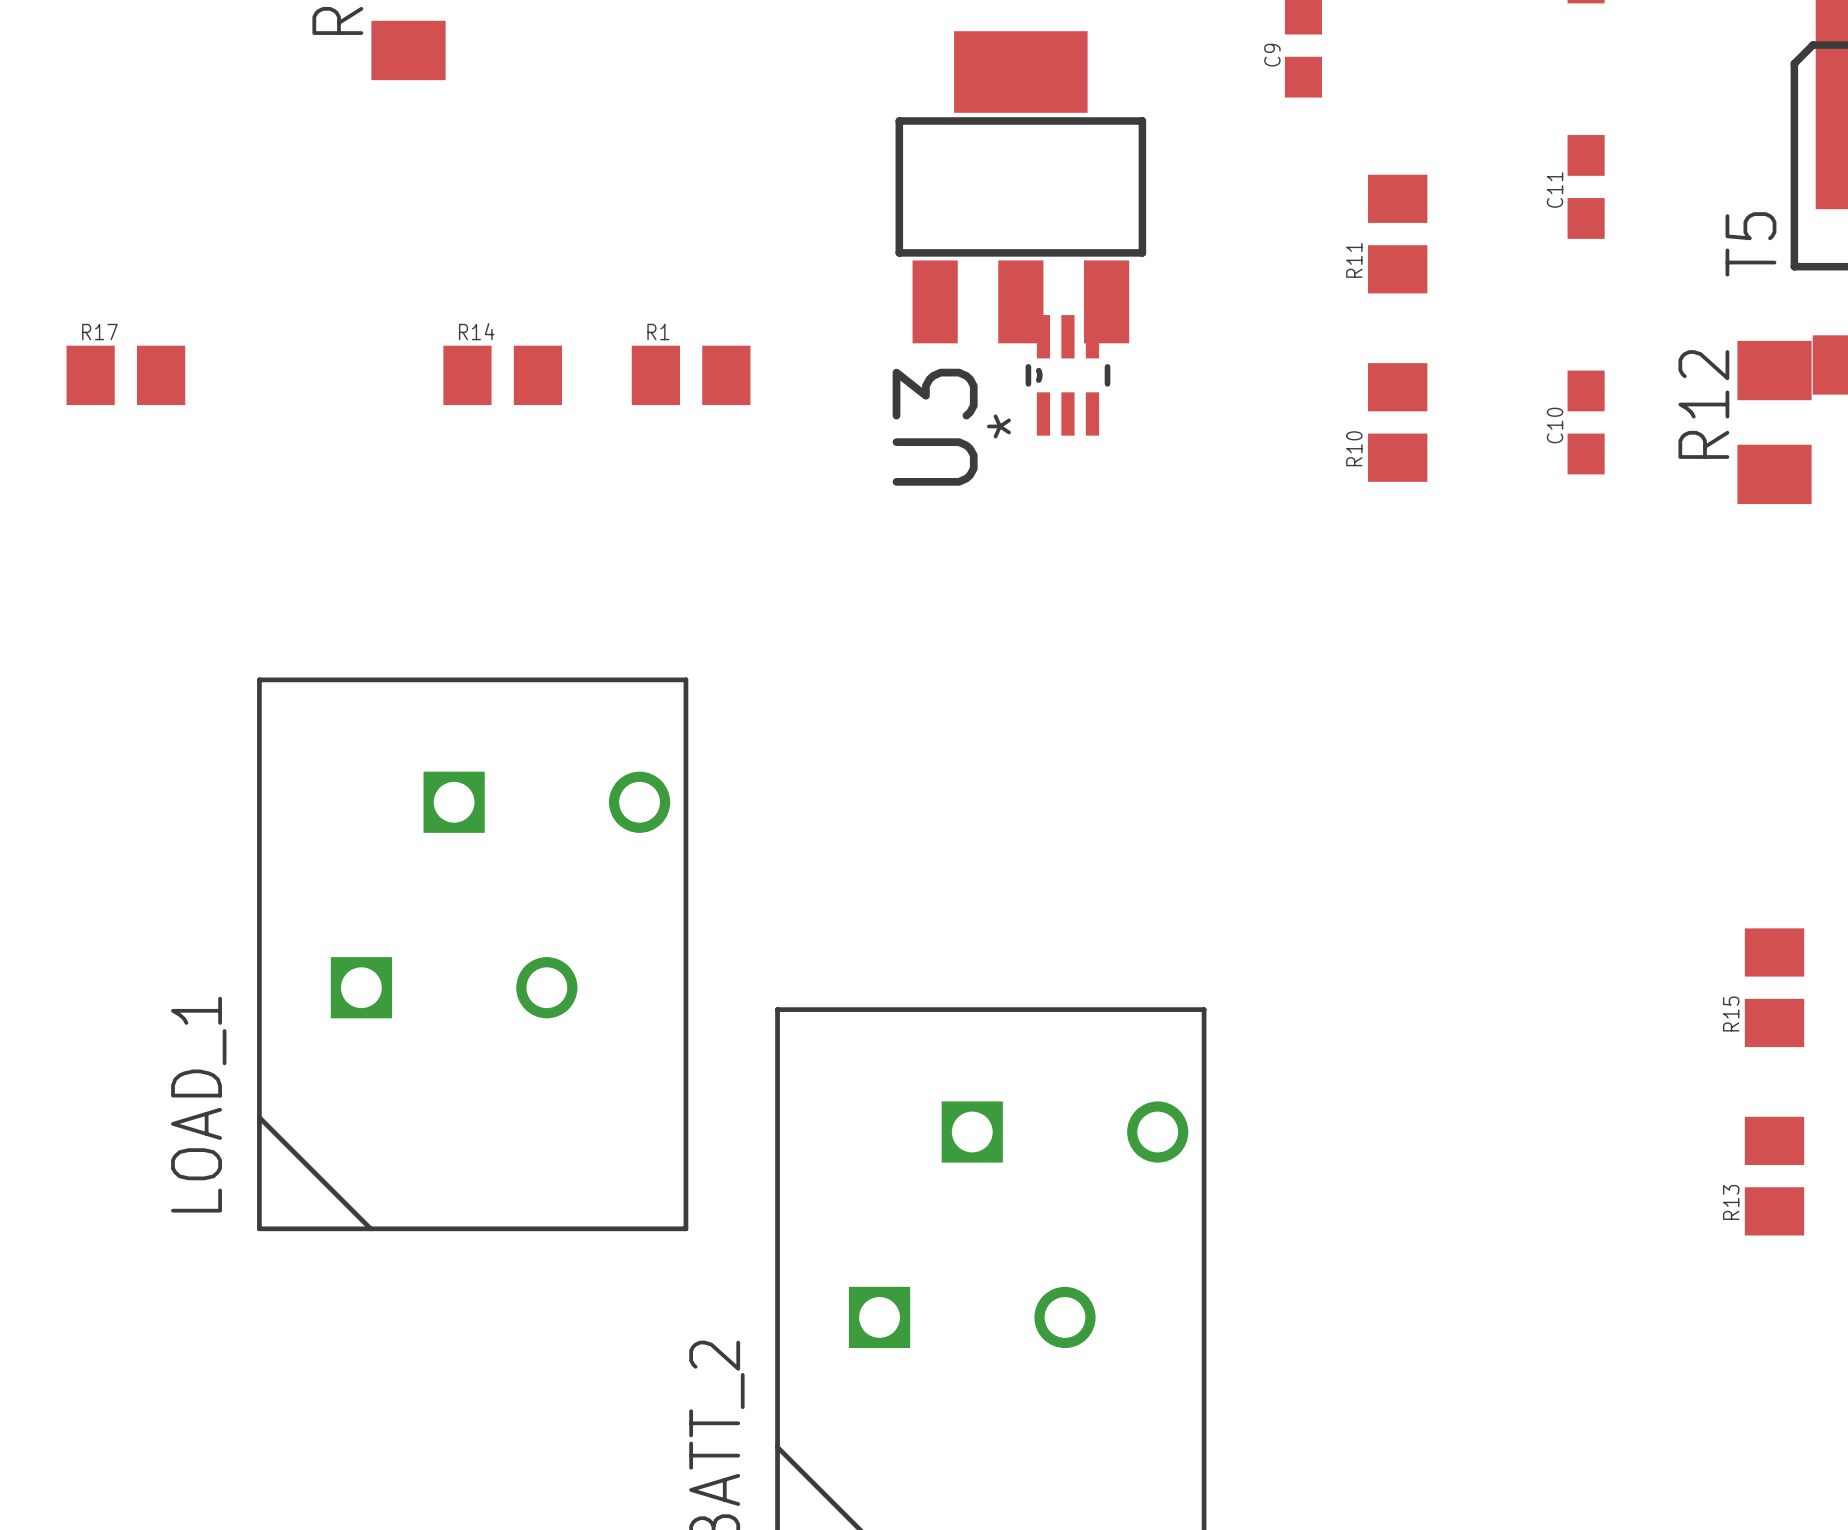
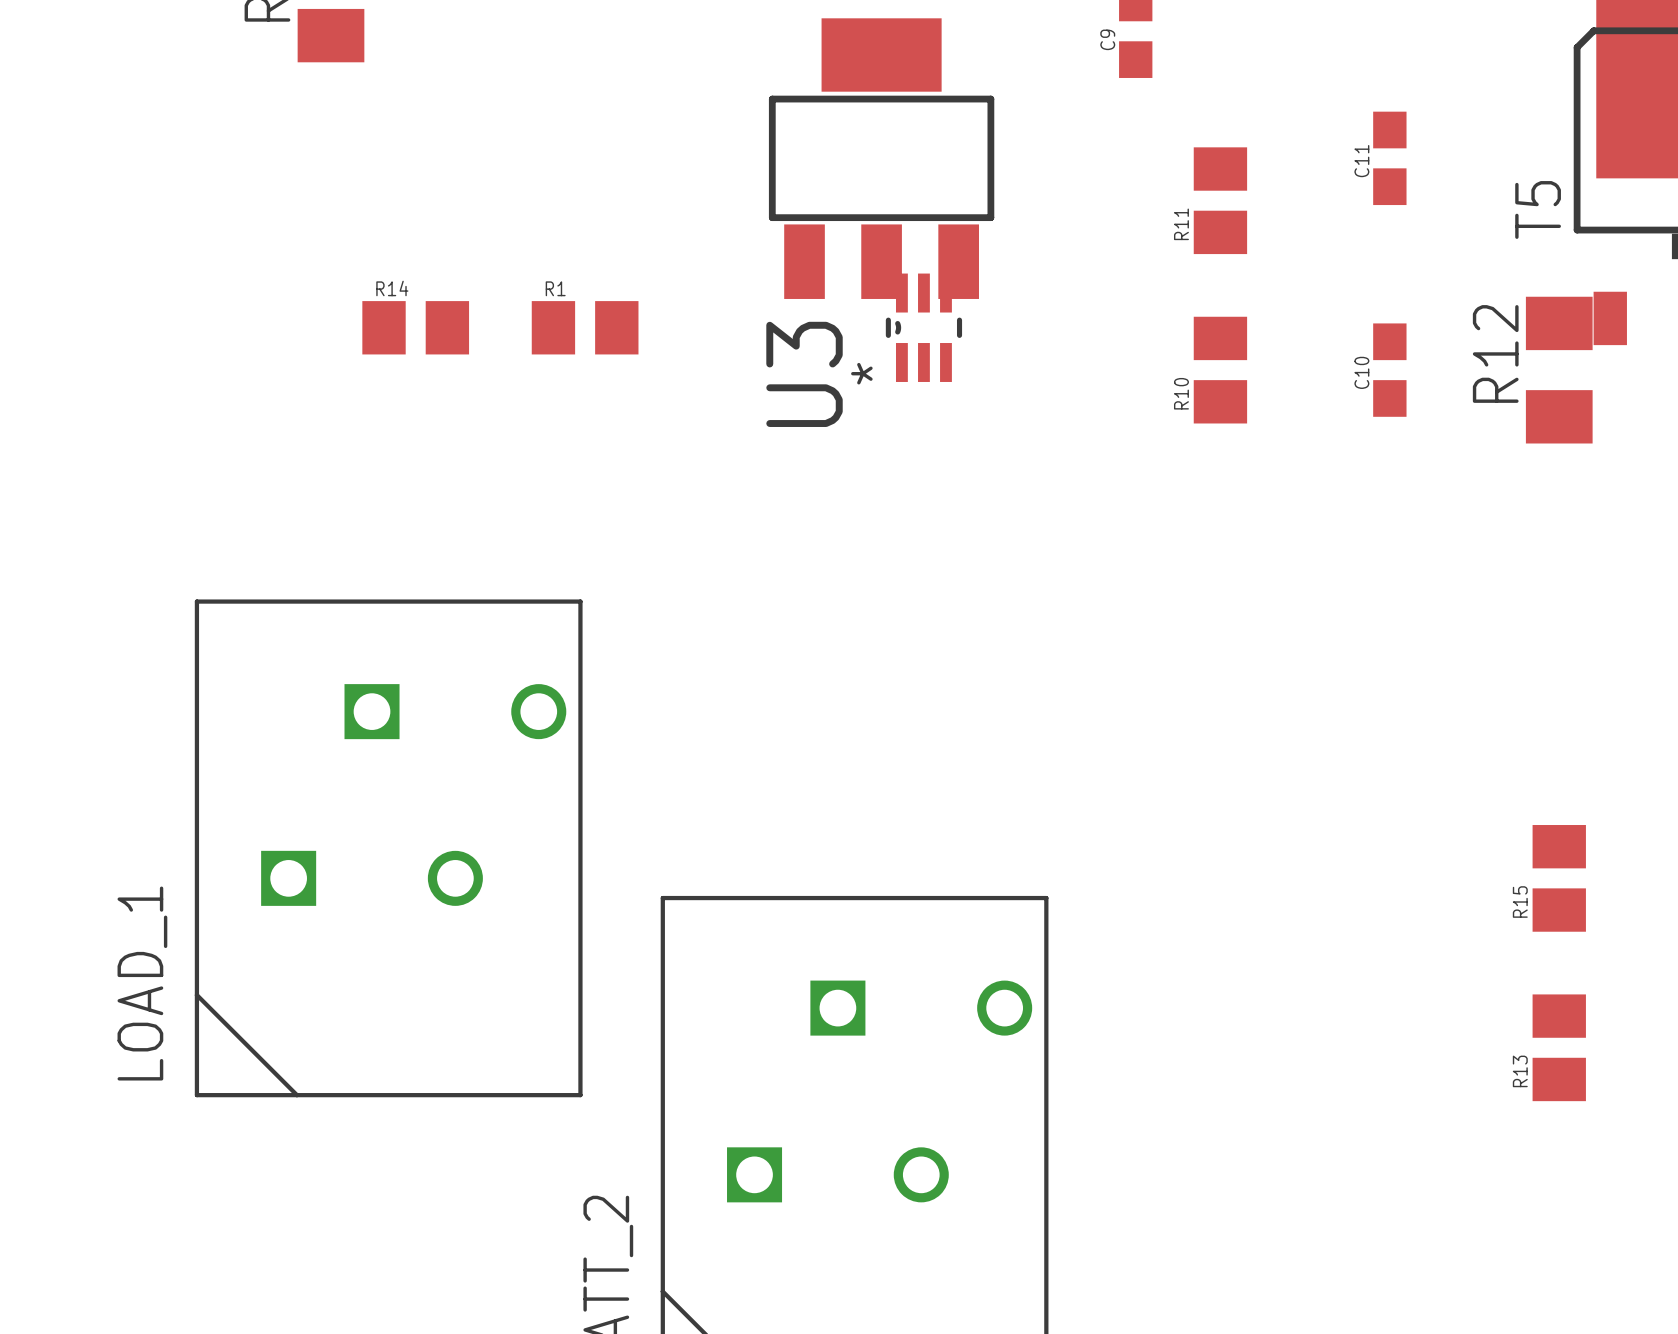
R17: (125, 375) -> none

